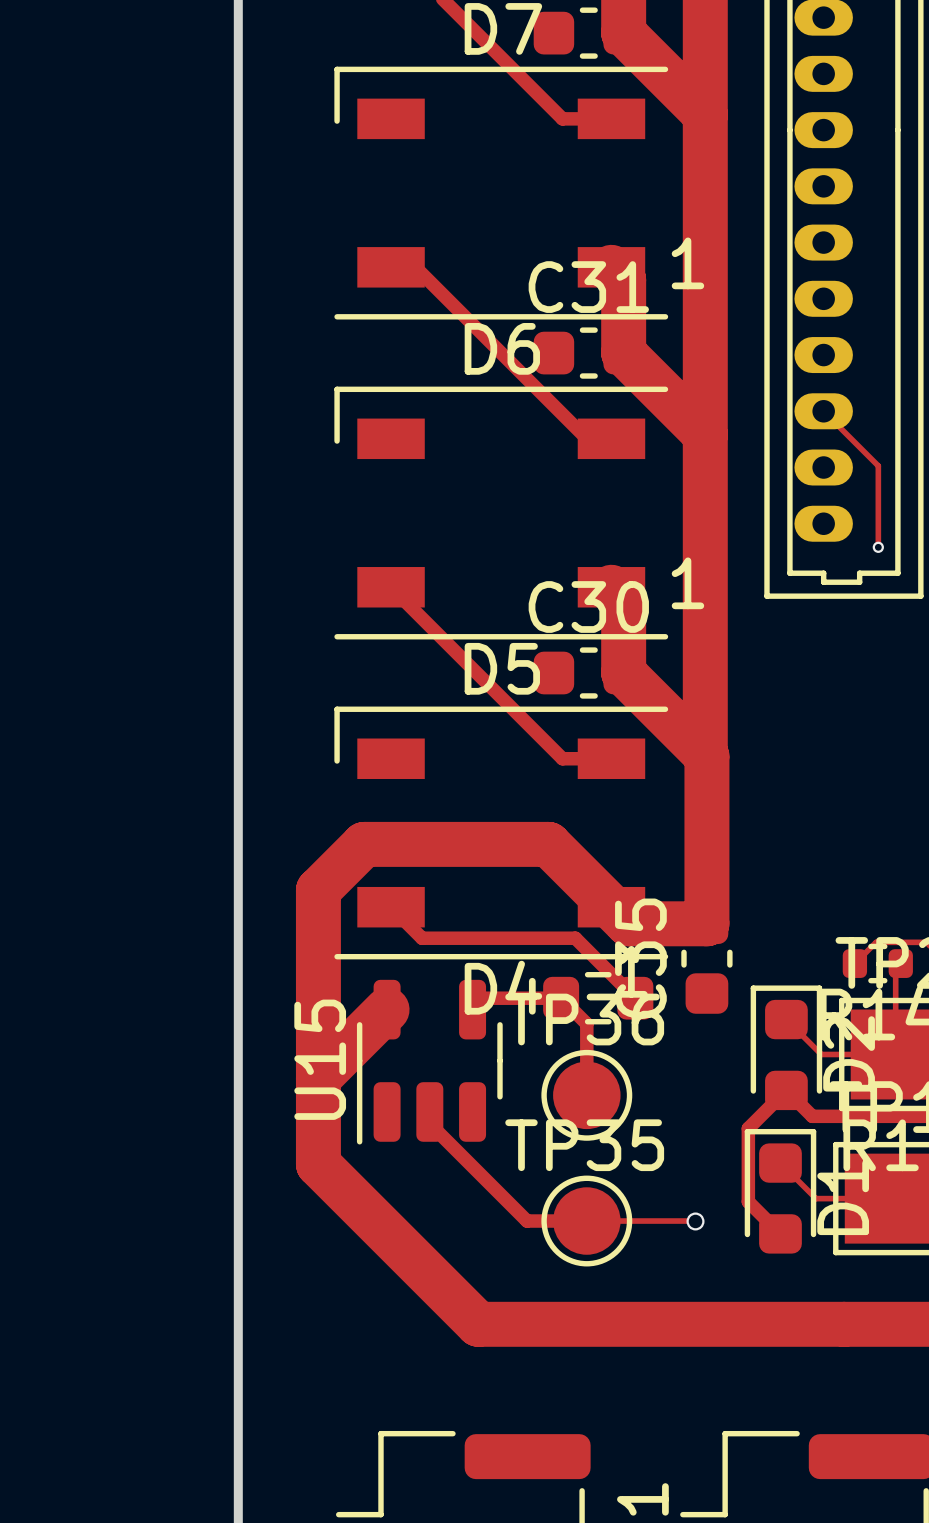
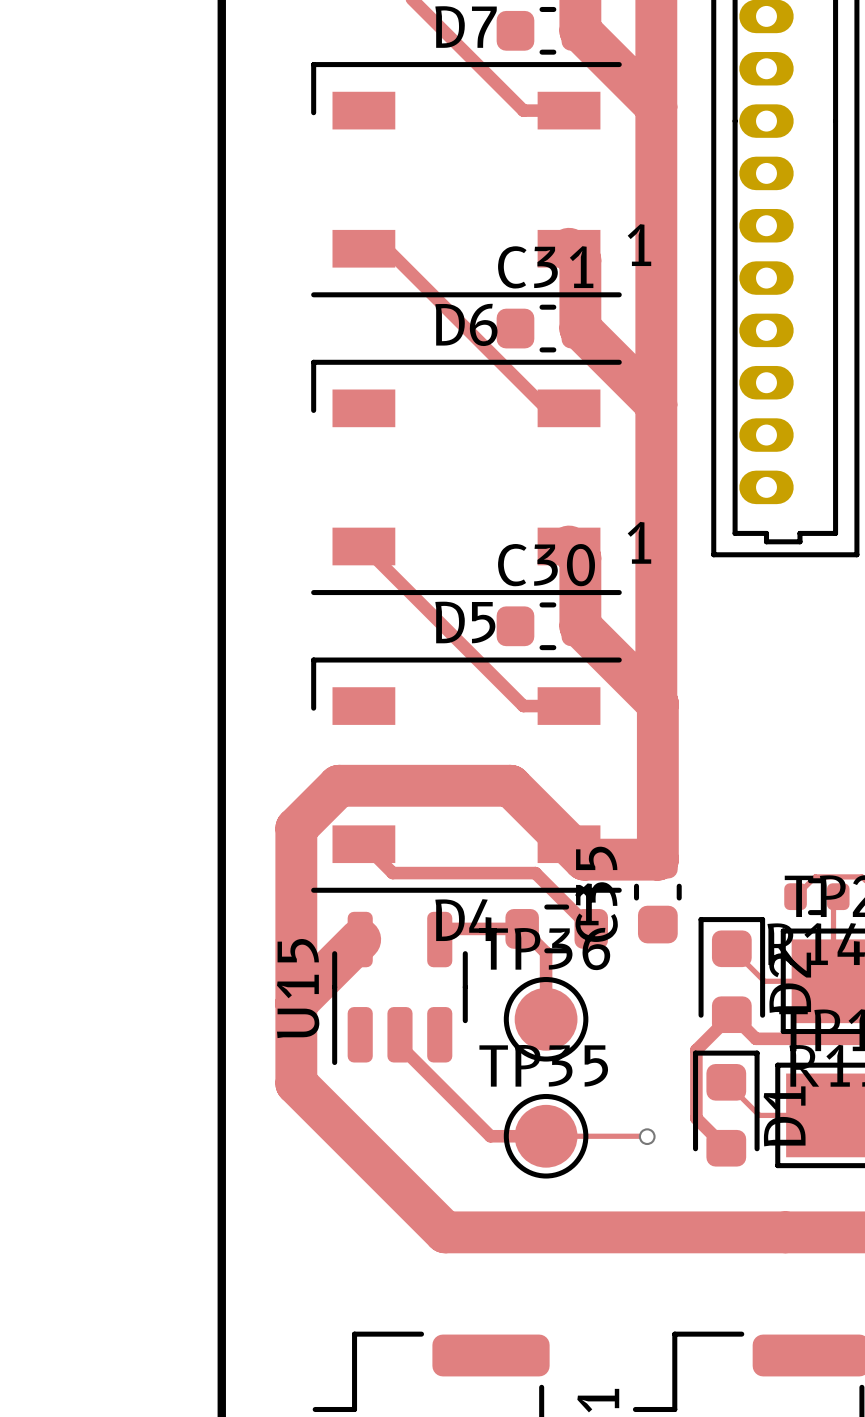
track: (823, 411) (878, 465) (878, 547) -> none
via: (878, 547) -> none

